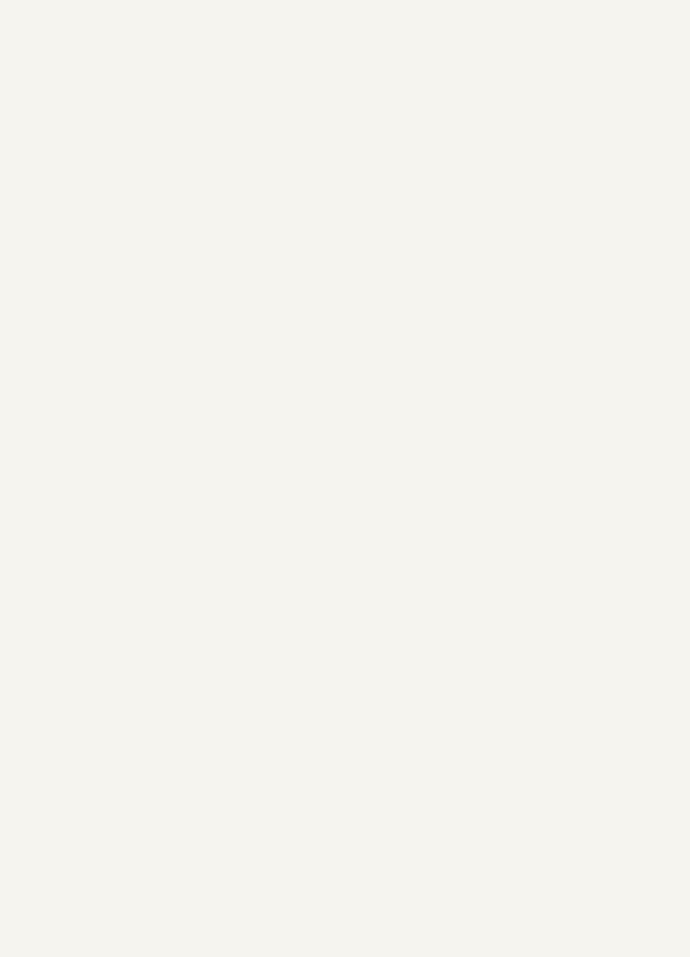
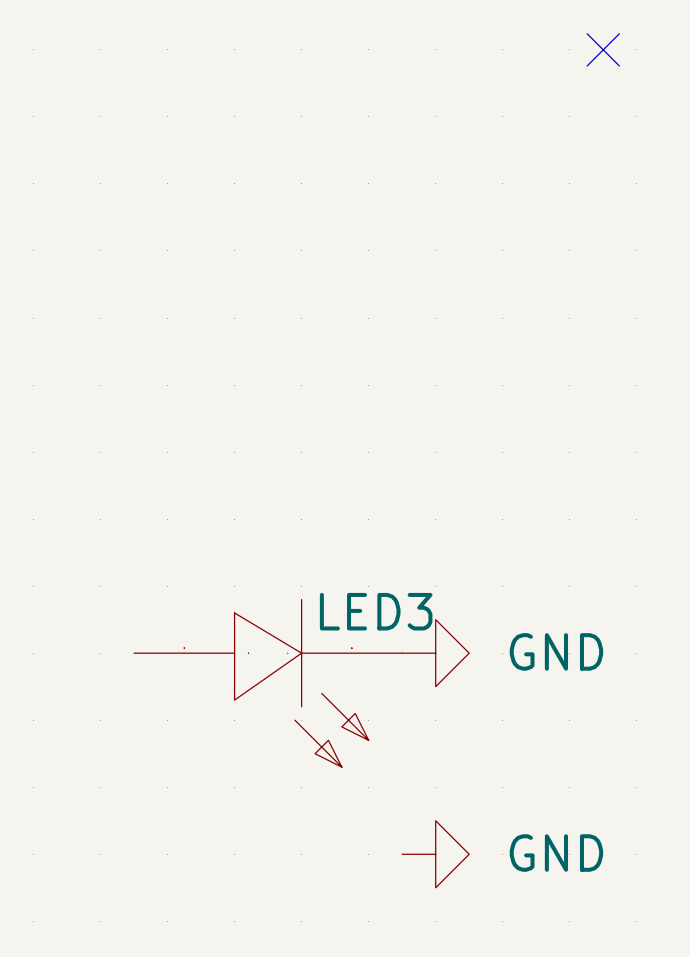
no-connect mark: none -> (603, 49)
power symbol: none -> GND (435, 653)
LED3: none -> (268, 683)
power symbol: none -> GND (435, 854)

